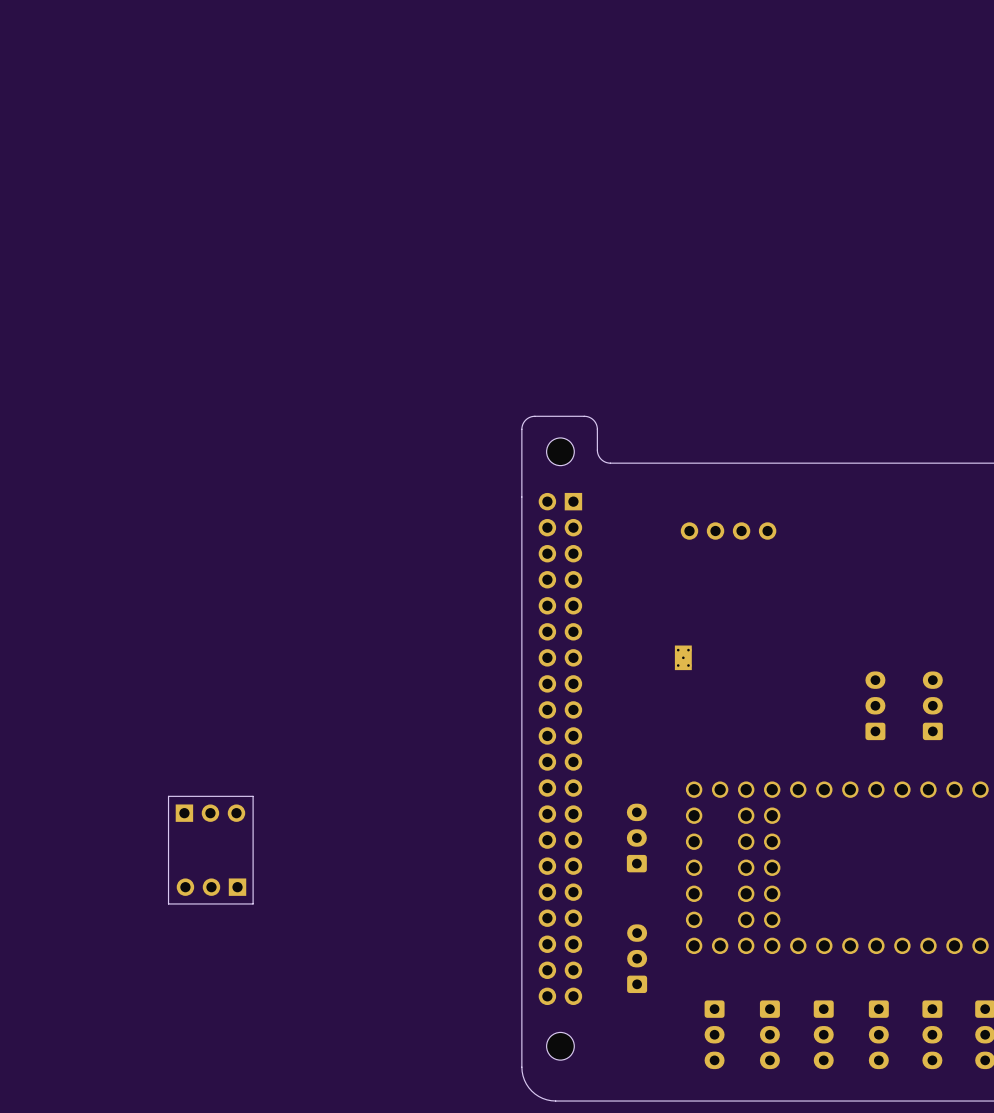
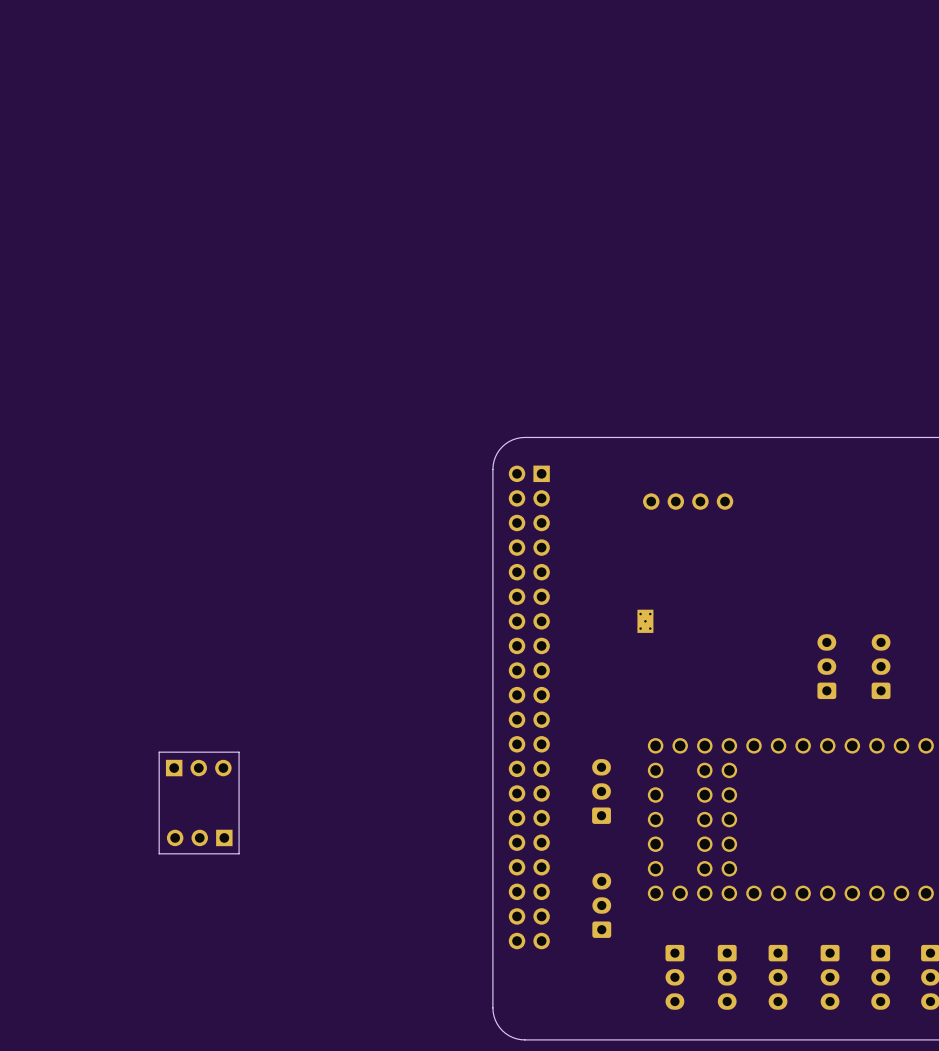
part: (560, 451) -> none
board edge: (610, 463) (603, 461) (598, 455) (596, 425) (590, 418) (584, 416) (529, 417) (524, 421) (521, 427) (521, 497) -> (576, 437) (524, 437) (512, 439) (502, 446) (497, 453) (492, 469)
part: (560, 1046) -> none

